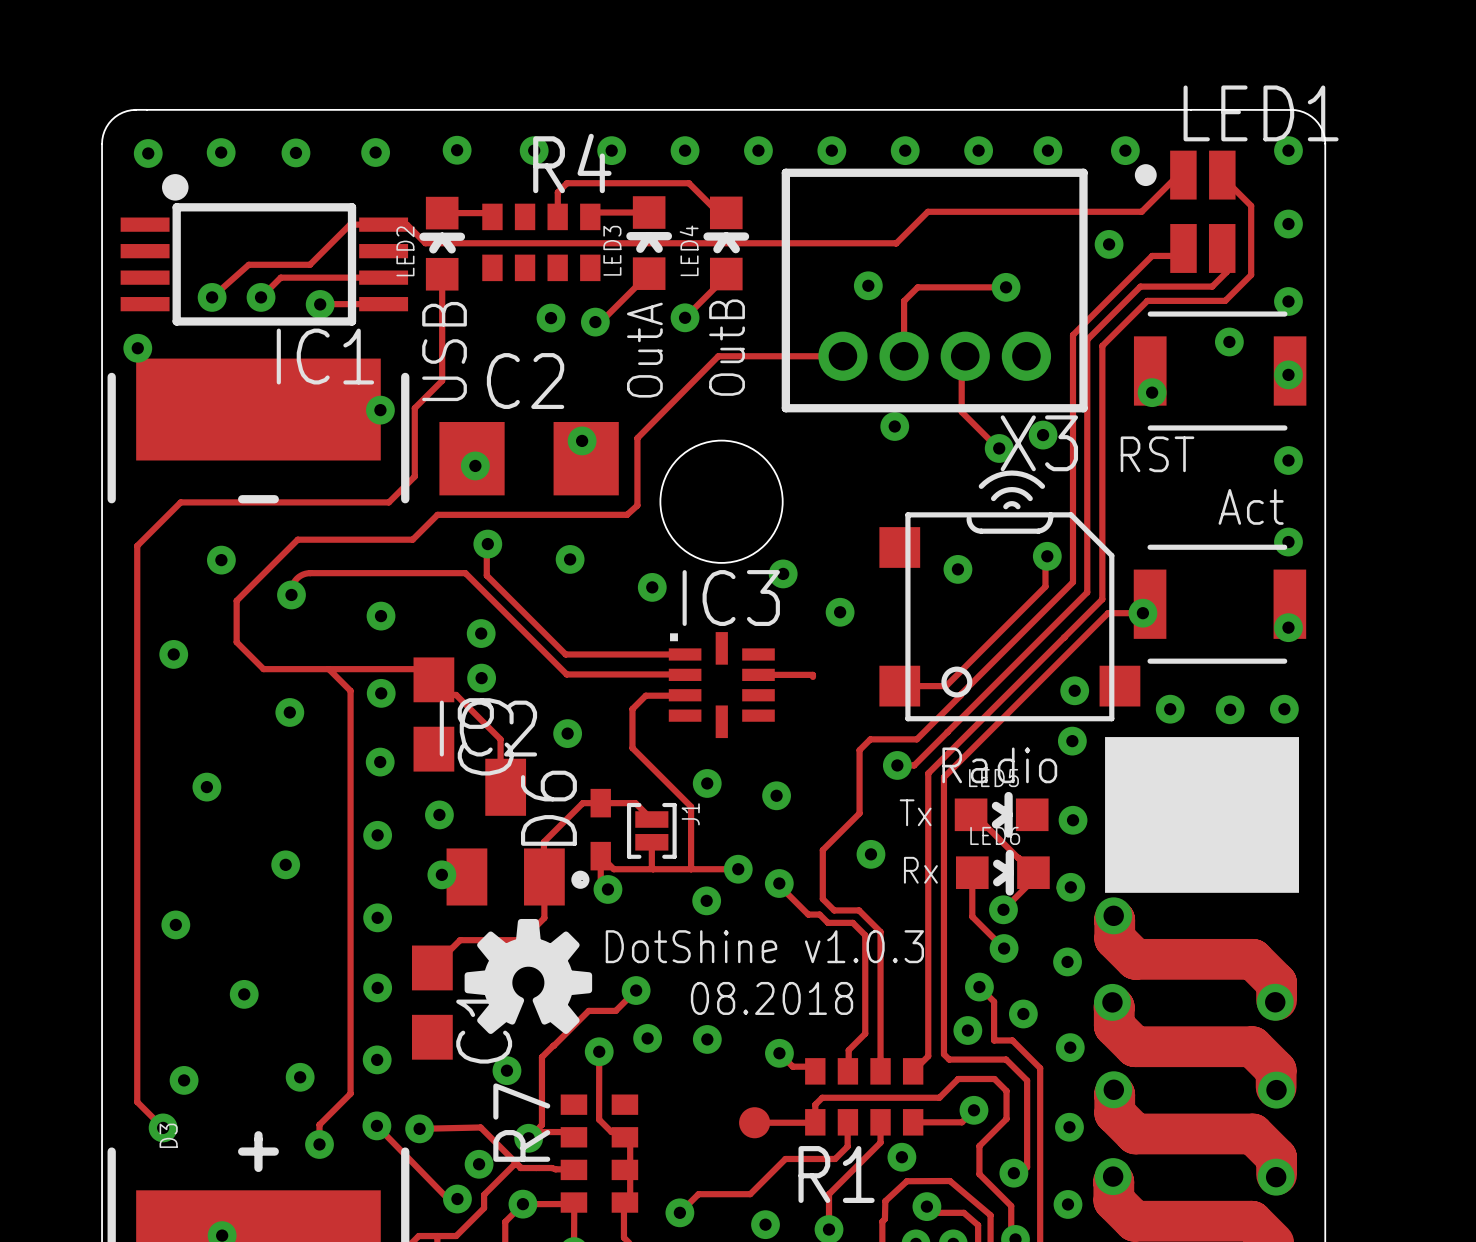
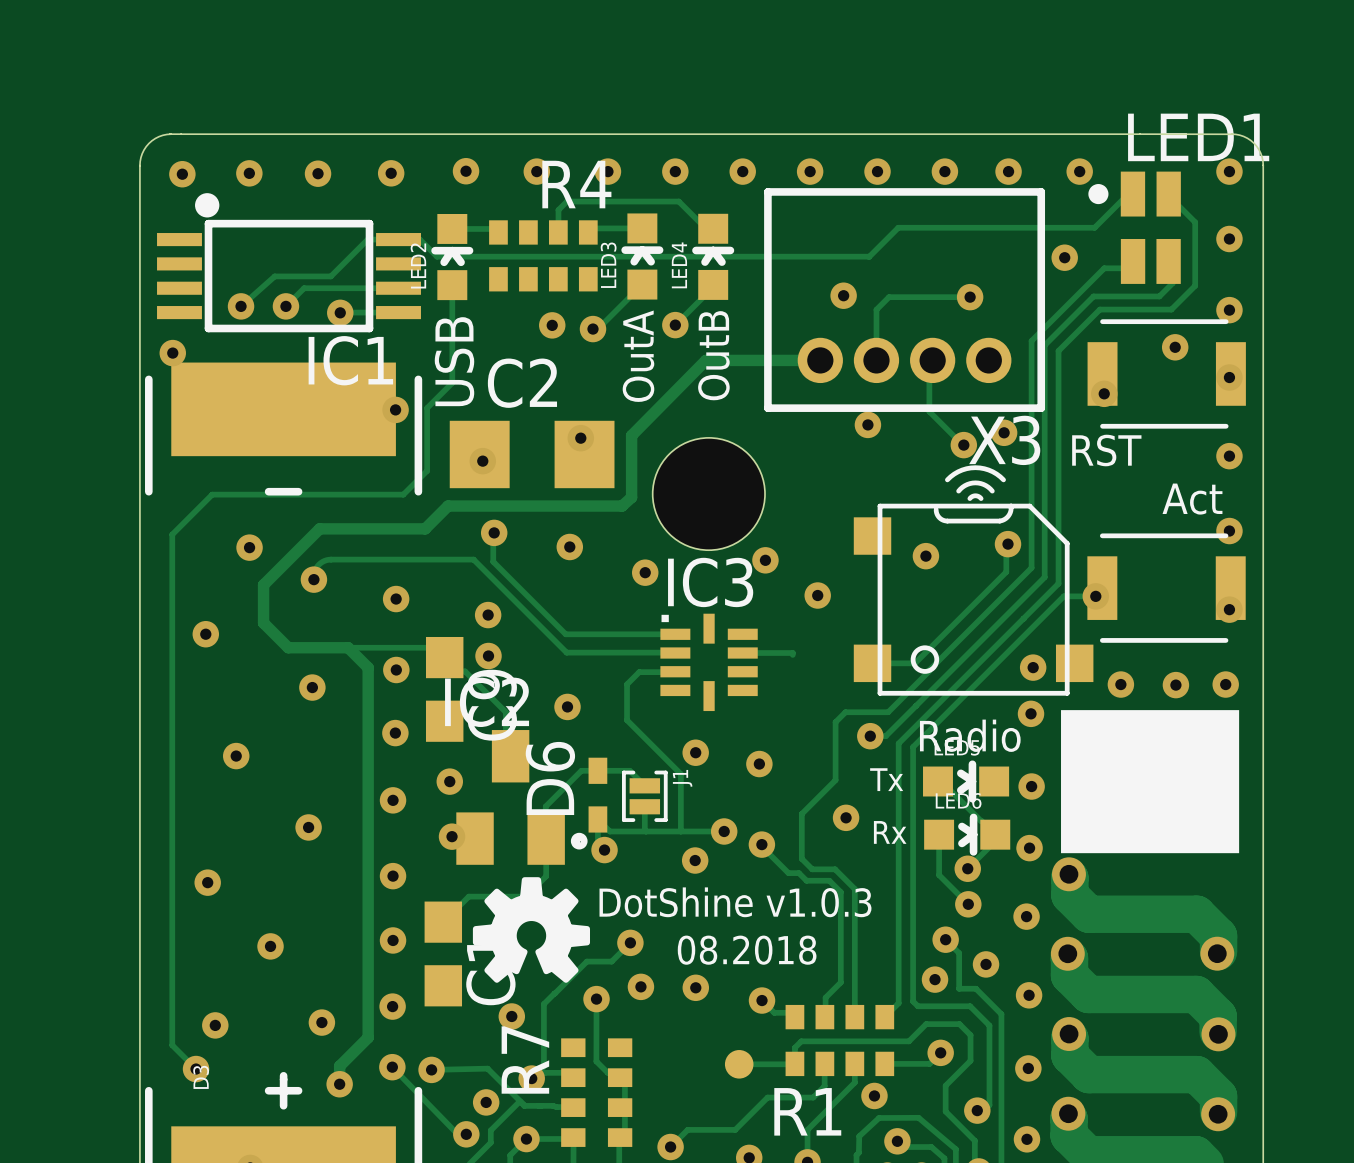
track width: thin (842, 356) (718, 356) (637, 438) (637, 505) (627, 514) (437, 514) (412, 539) (297, 539) (236, 600) (236, 642) (263, 669) (328, 669) (350, 690) (350, 1093) (319, 1124) (319, 1144) -> thick (820, 360) (705, 360) (631, 435) (631, 497) (622, 506) (448, 506) (425, 528) (319, 528) (263, 584) (263, 623) (288, 647) (348, 647) (368, 667) (368, 1037) (339, 1066) (339, 1084)

